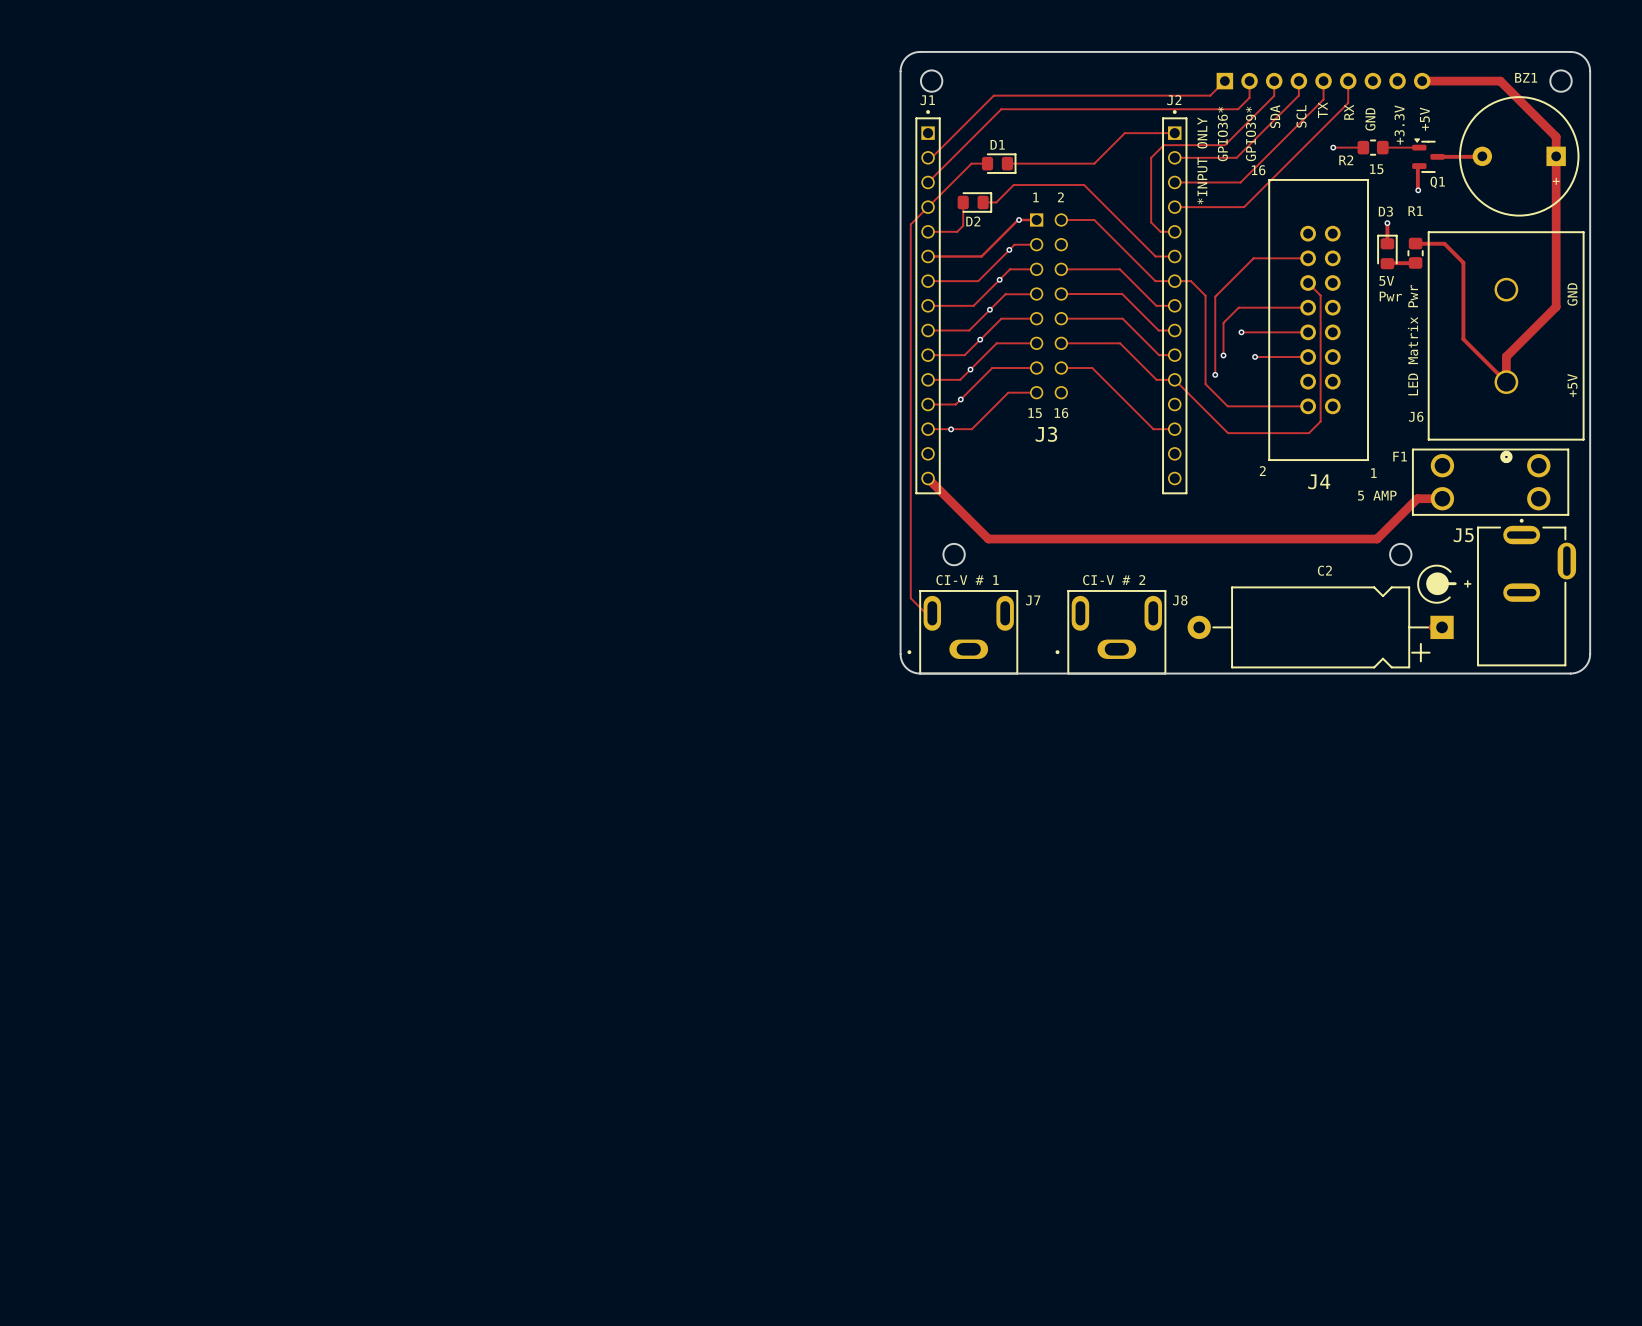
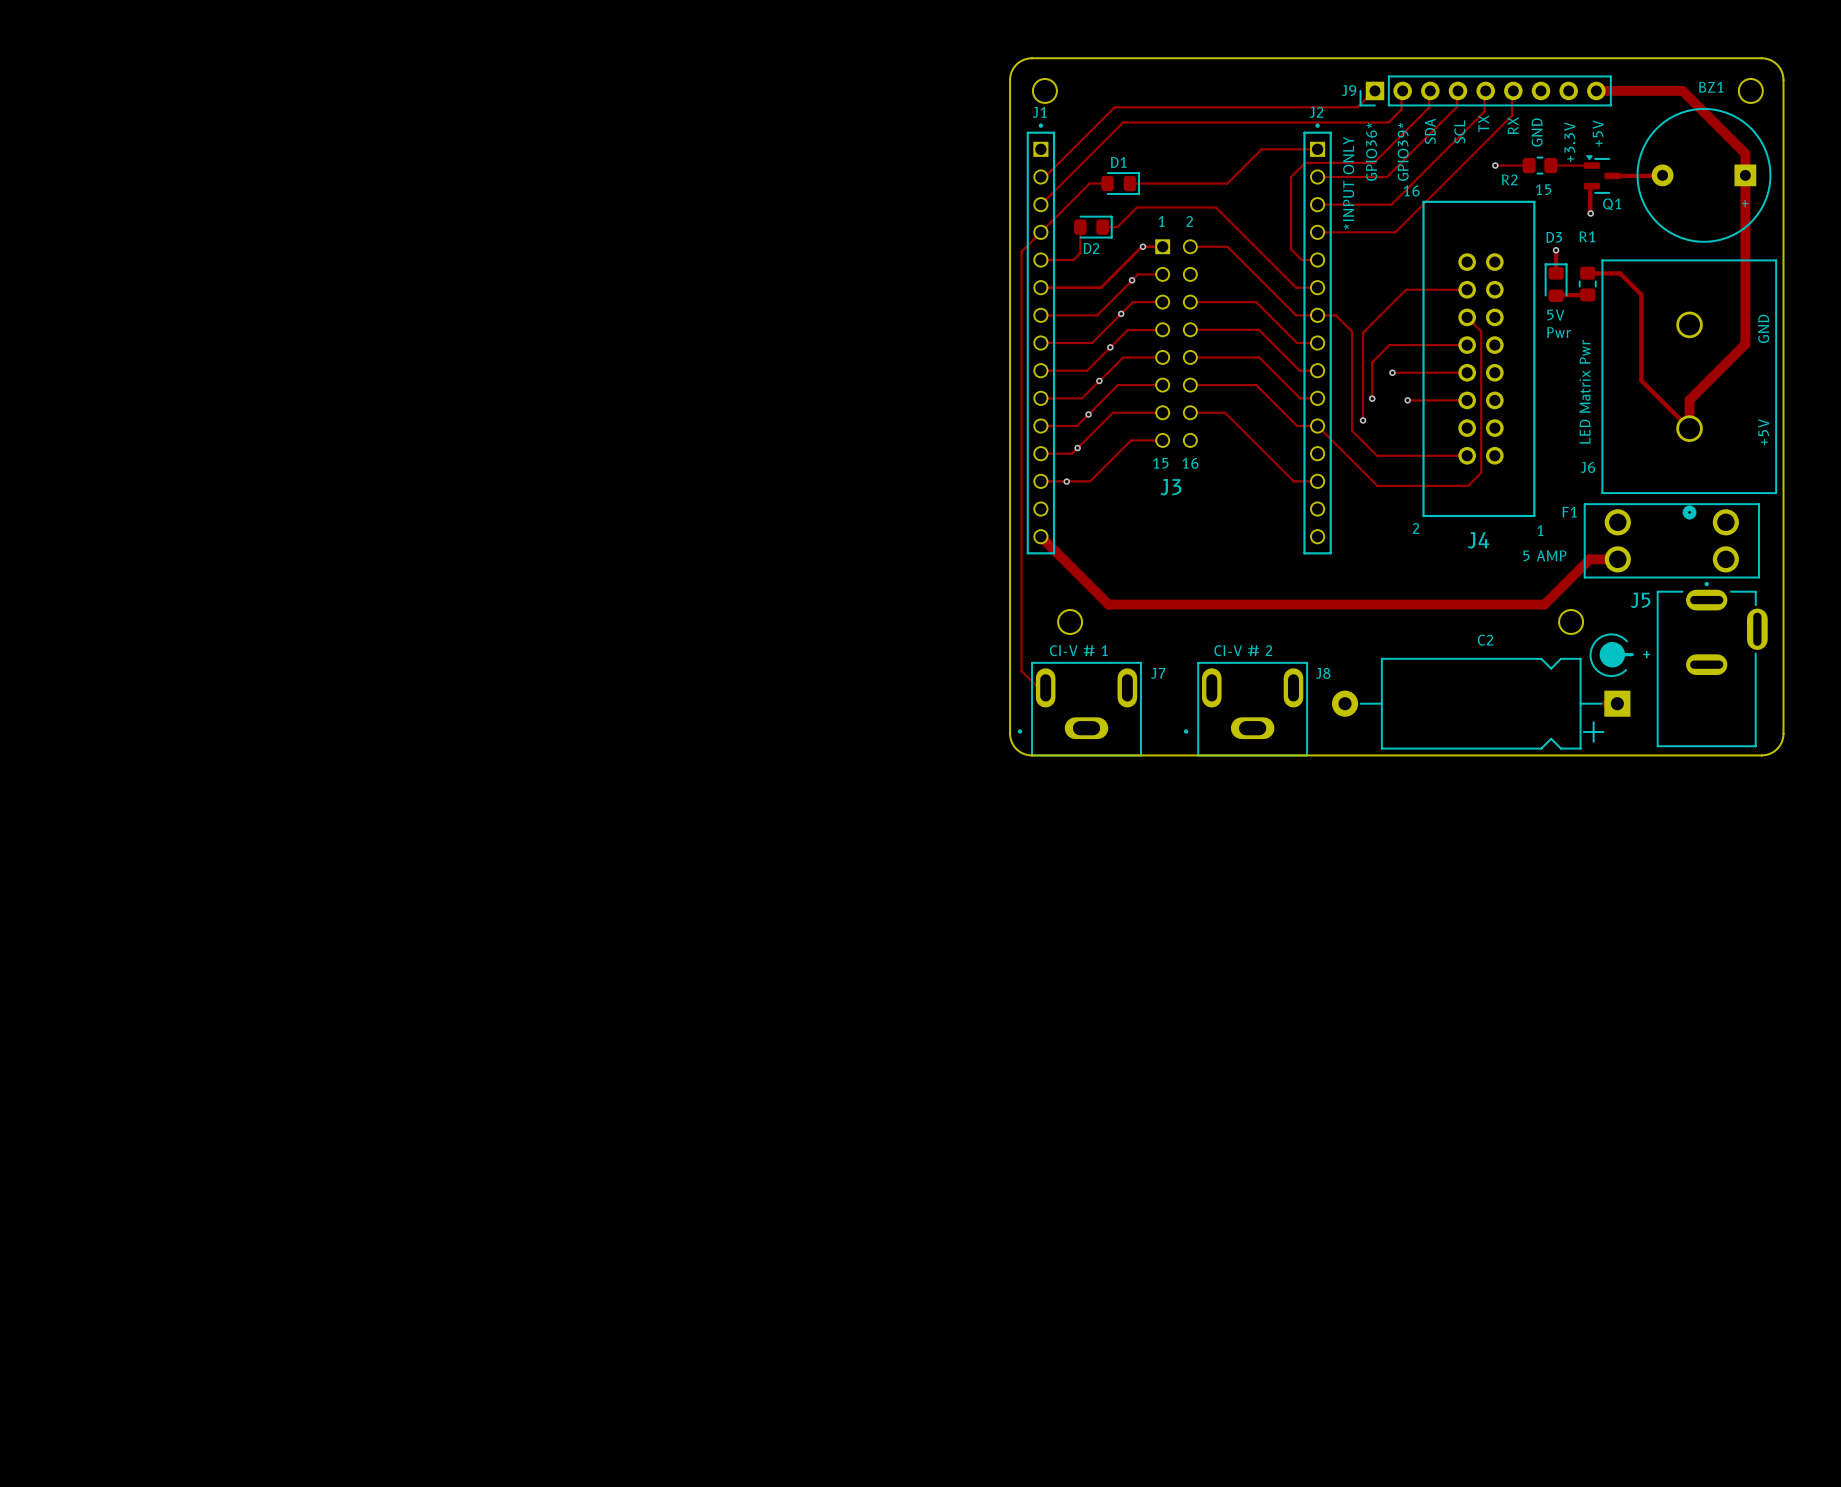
J9 side: bottom (1323, 81) -> top (1485, 90)

